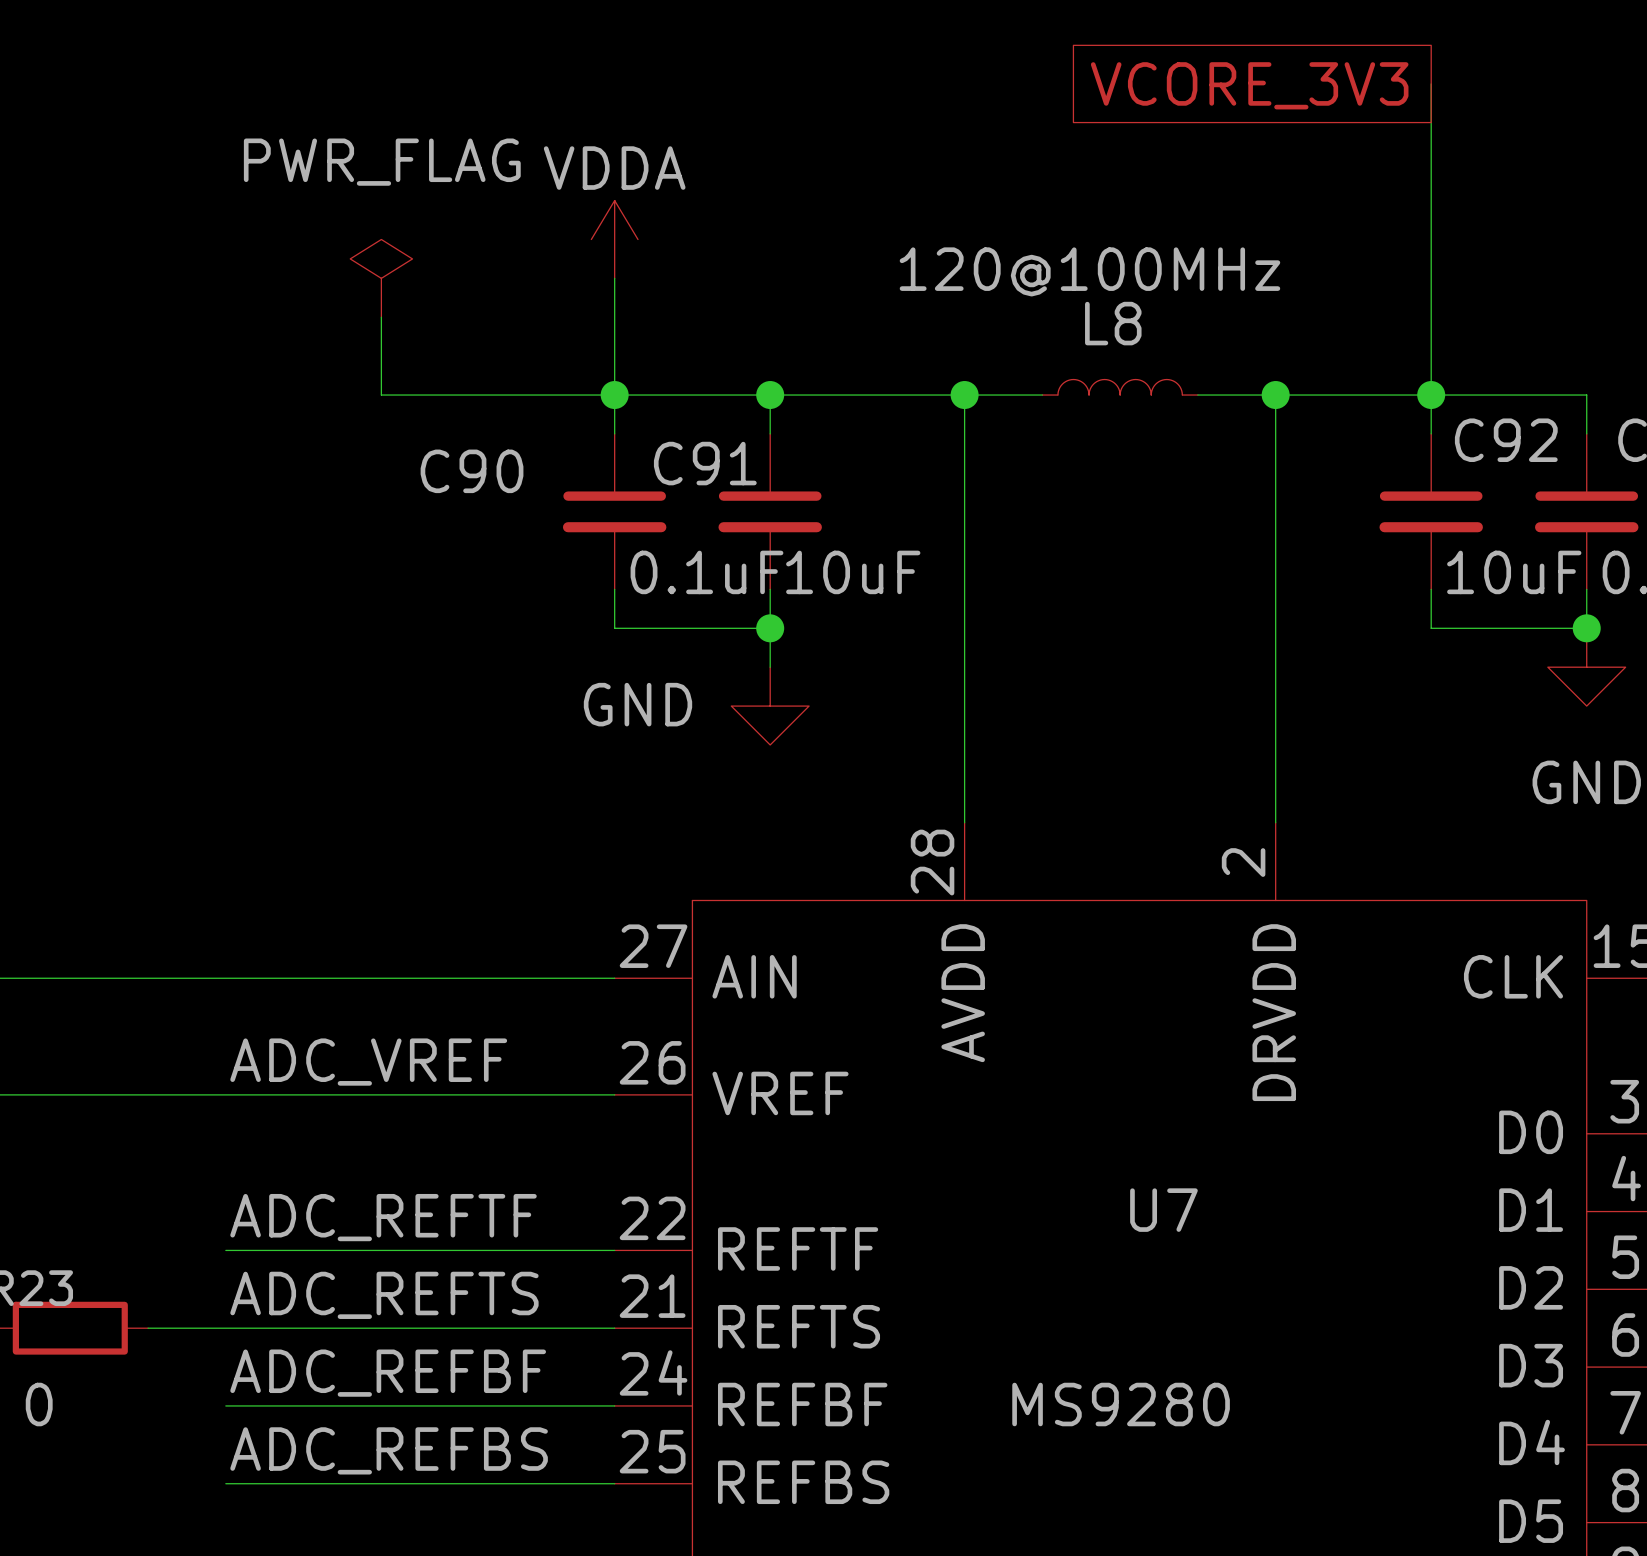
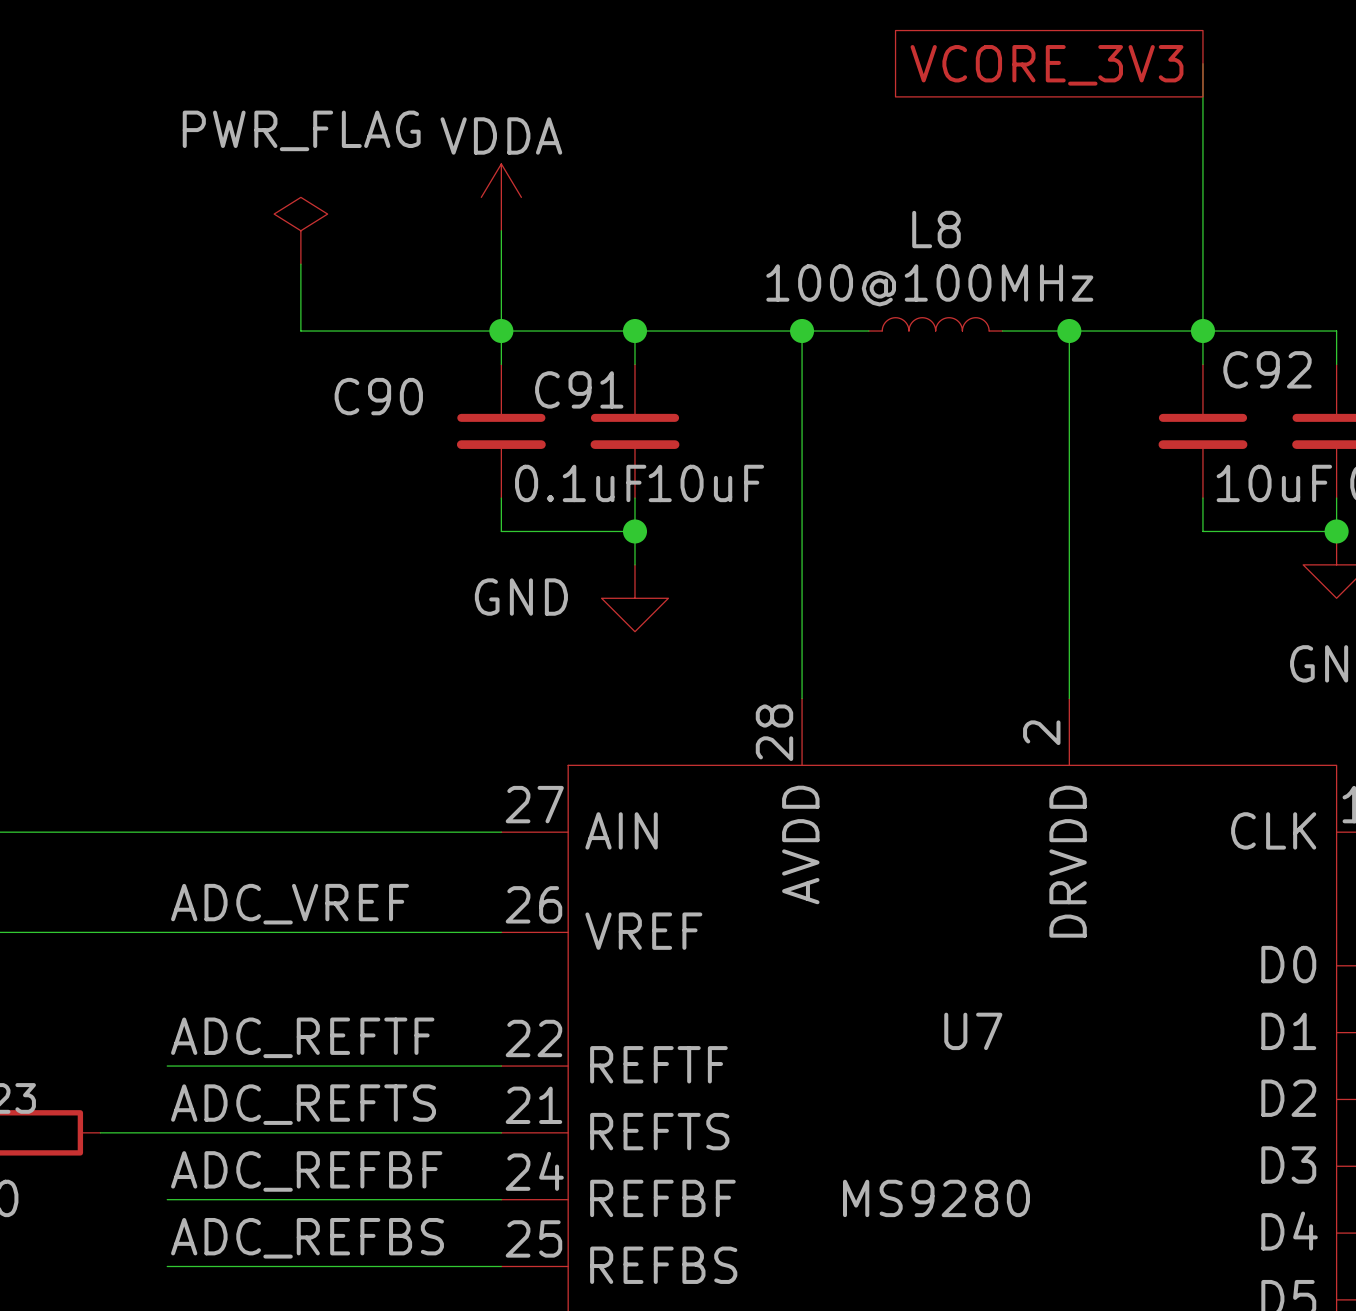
L8 value: 120@100MHz (1089, 271) -> 100@100MHz (929, 285)
L8 name position: L8 (1113, 323) -> L8 (936, 229)

